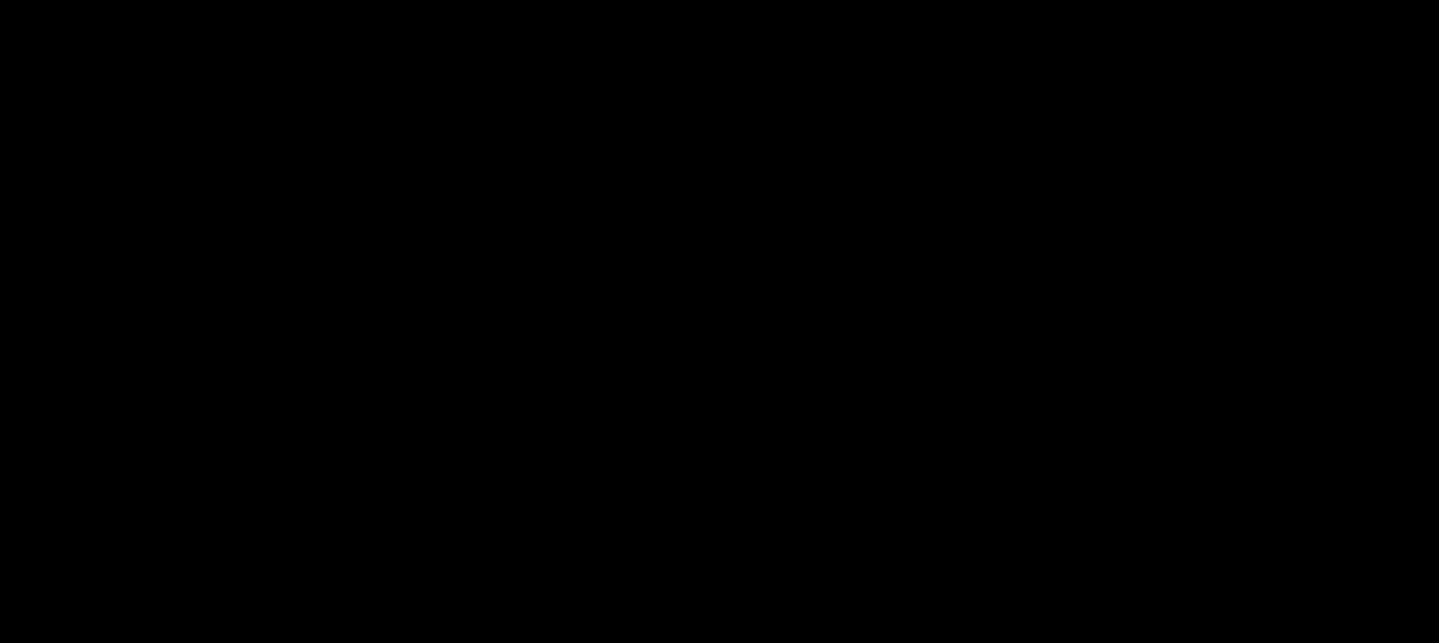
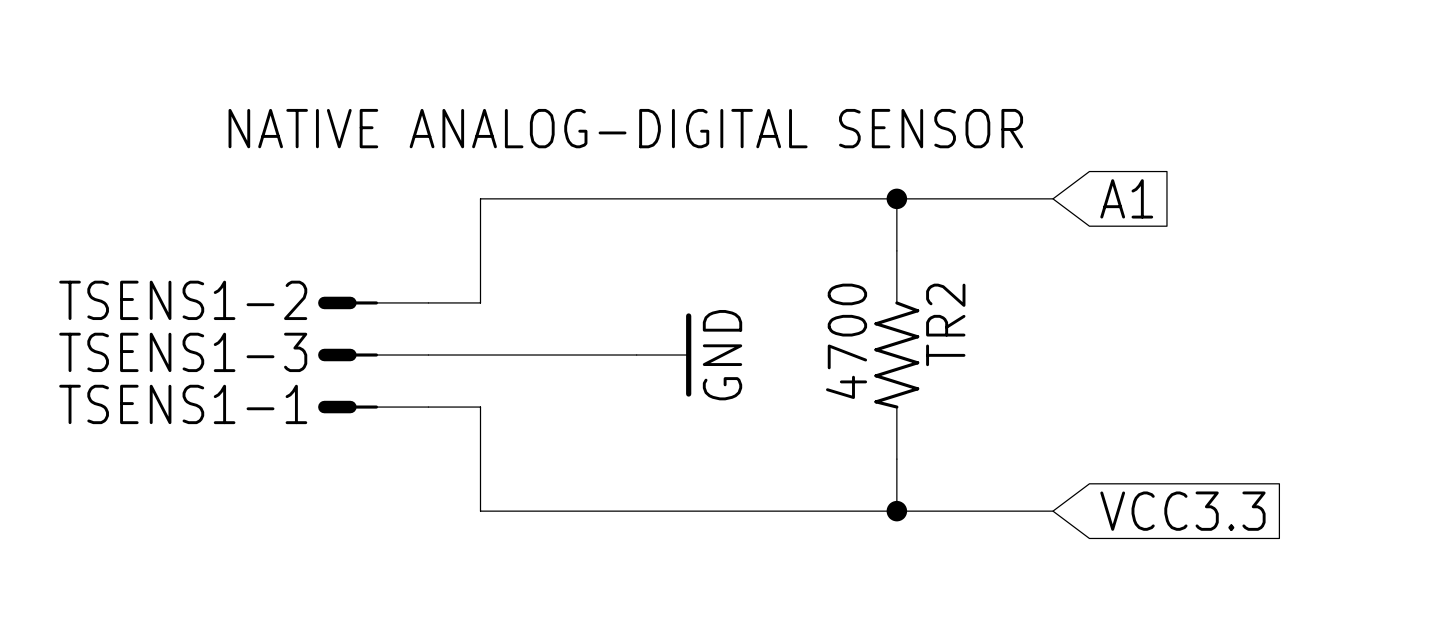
text: none -> NATIVE ANALOG-DIGITAL SENSOR (625, 128)
wire: none -> (896, 198) (896, 250)
junction: none -> (896, 198)
wire: none -> (1053, 198) (480, 198) (480, 302) (428, 302)
global label: none -> A1 (1126, 198)
TSENS1-2: none -> (373, 302)
TSENS1-3: none -> (373, 355)
wire: none -> (428, 355) (636, 355)
power symbol: none -> GND (663, 355)
TR2: none -> 4700 (896, 355)
TSENS1-1: none -> (373, 407)
wire: none -> (428, 407) (480, 407) (480, 511) (1053, 511)
wire: none -> (896, 459) (896, 511)
junction: none -> (896, 511)
global label: none -> VCC3.3 (1182, 511)

